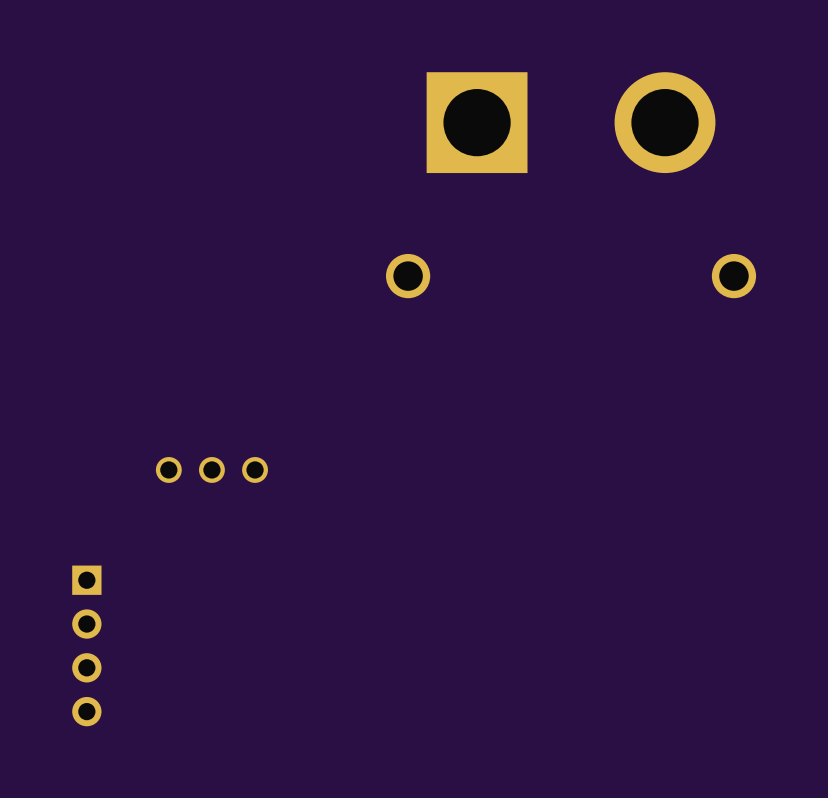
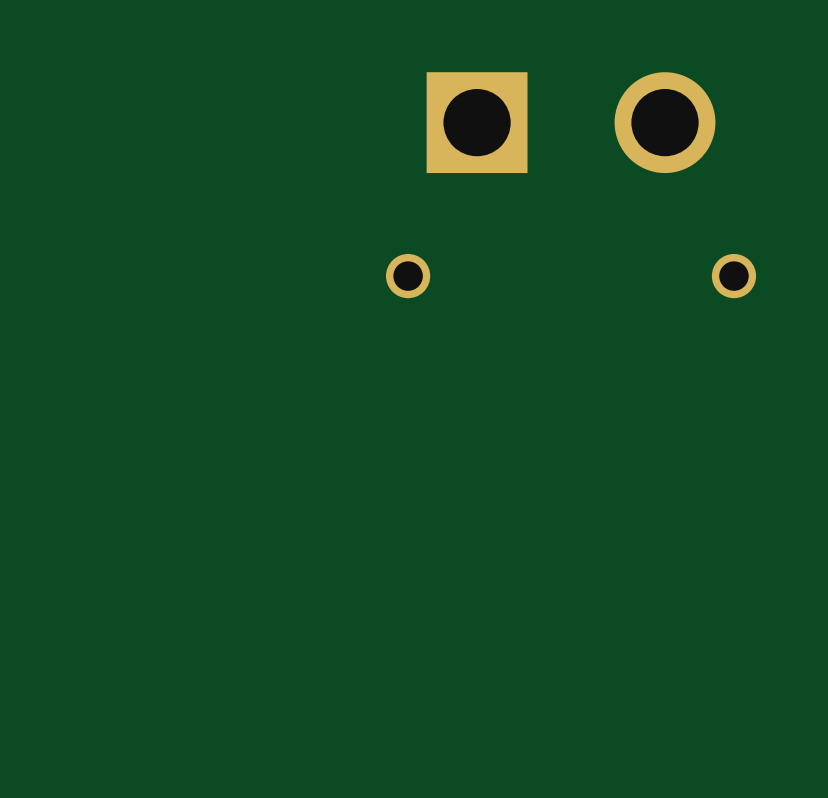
part: (211, 469) -> none
part: (86, 645) -> none

